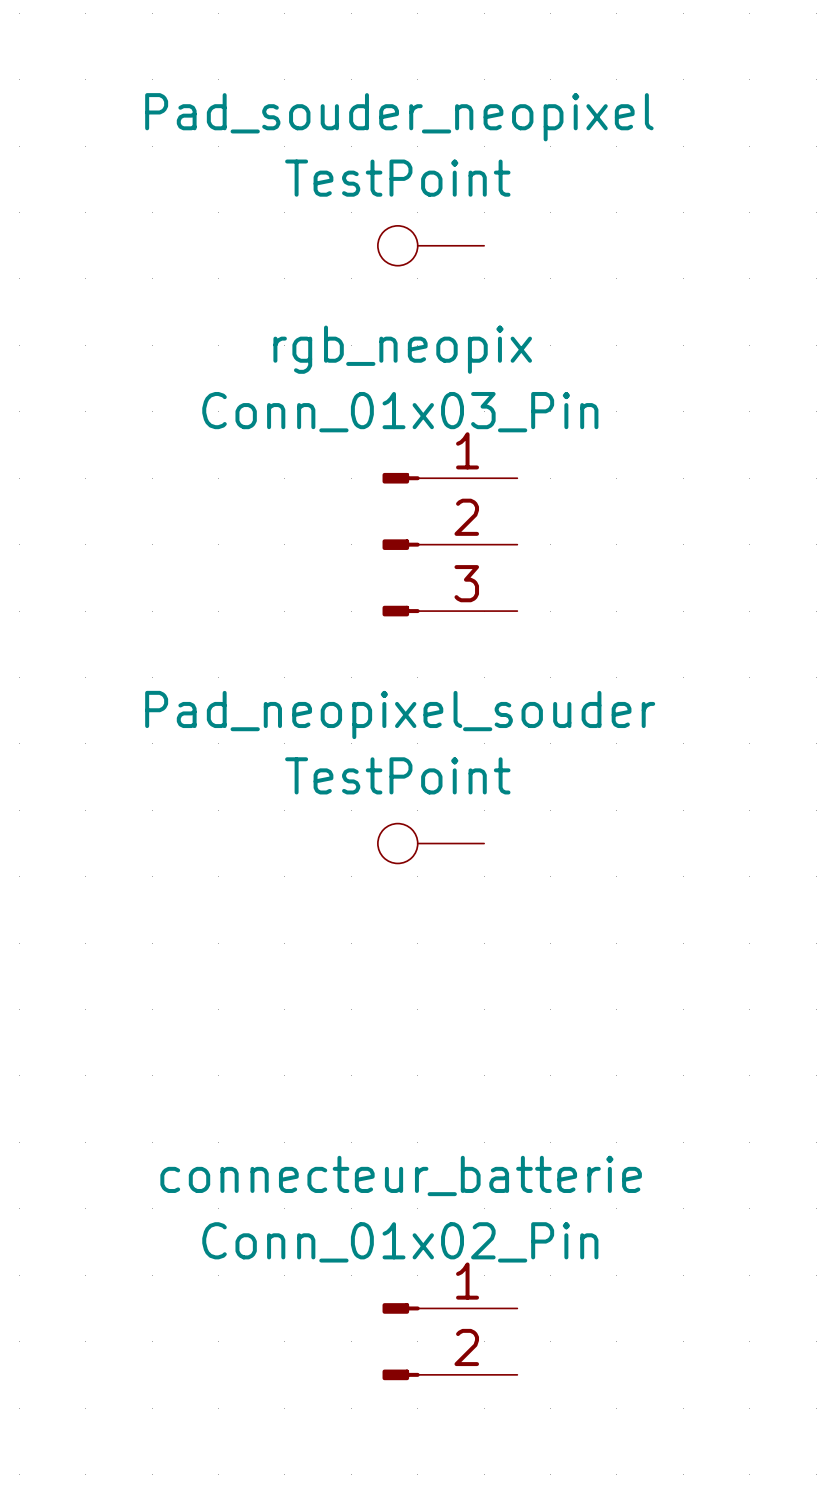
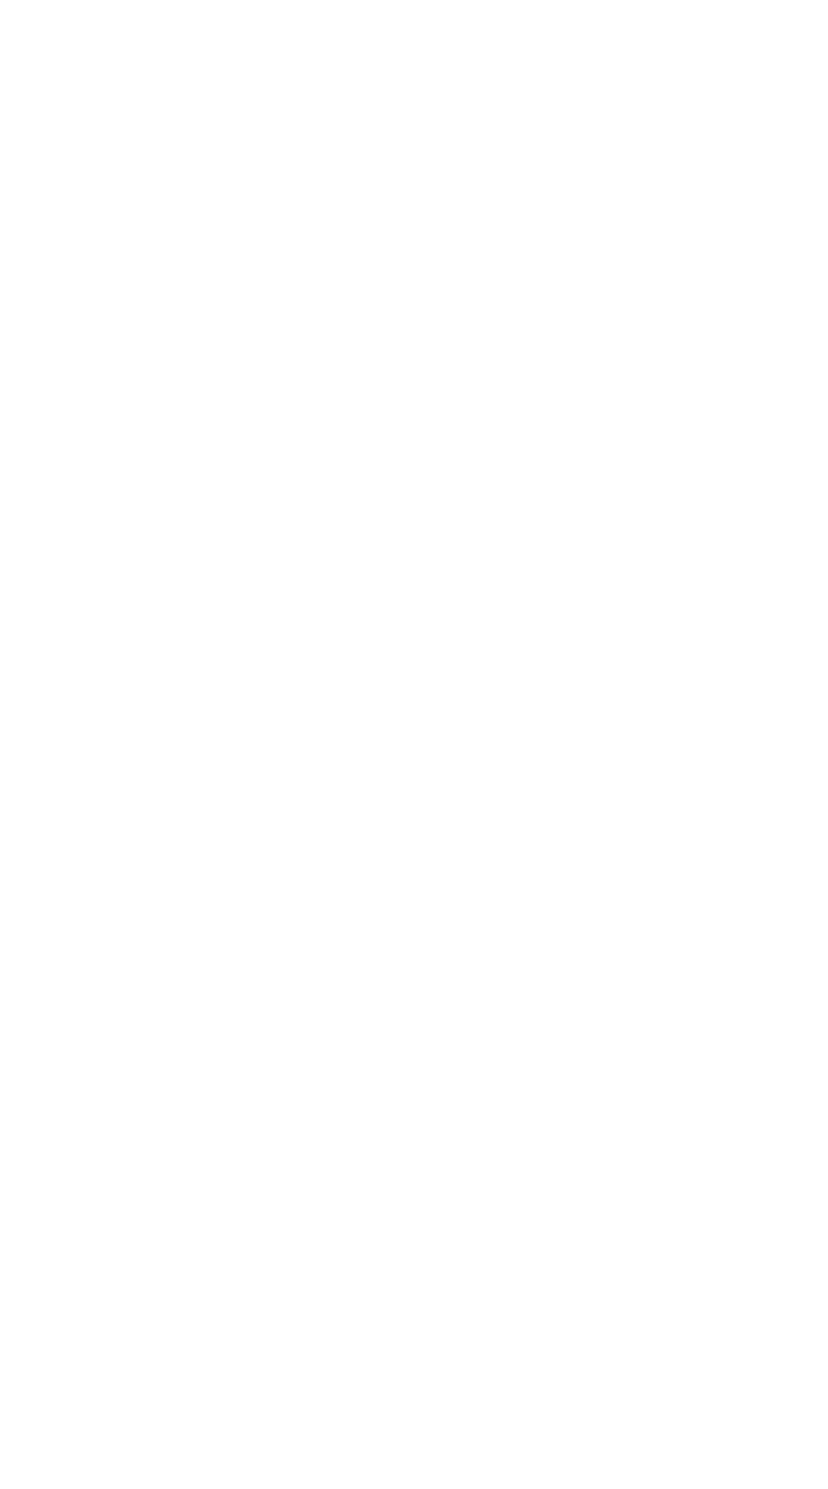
Pad_souder_neopixel: TestPoint (431, 245) -> none
rgb_neopix: Conn_01x03_Pin (449, 544) -> none
Pad_neopixel_souder: TestPoint (431, 843) -> none
connecteur_batterie: Conn_01x02_Pin (449, 1341) -> none

